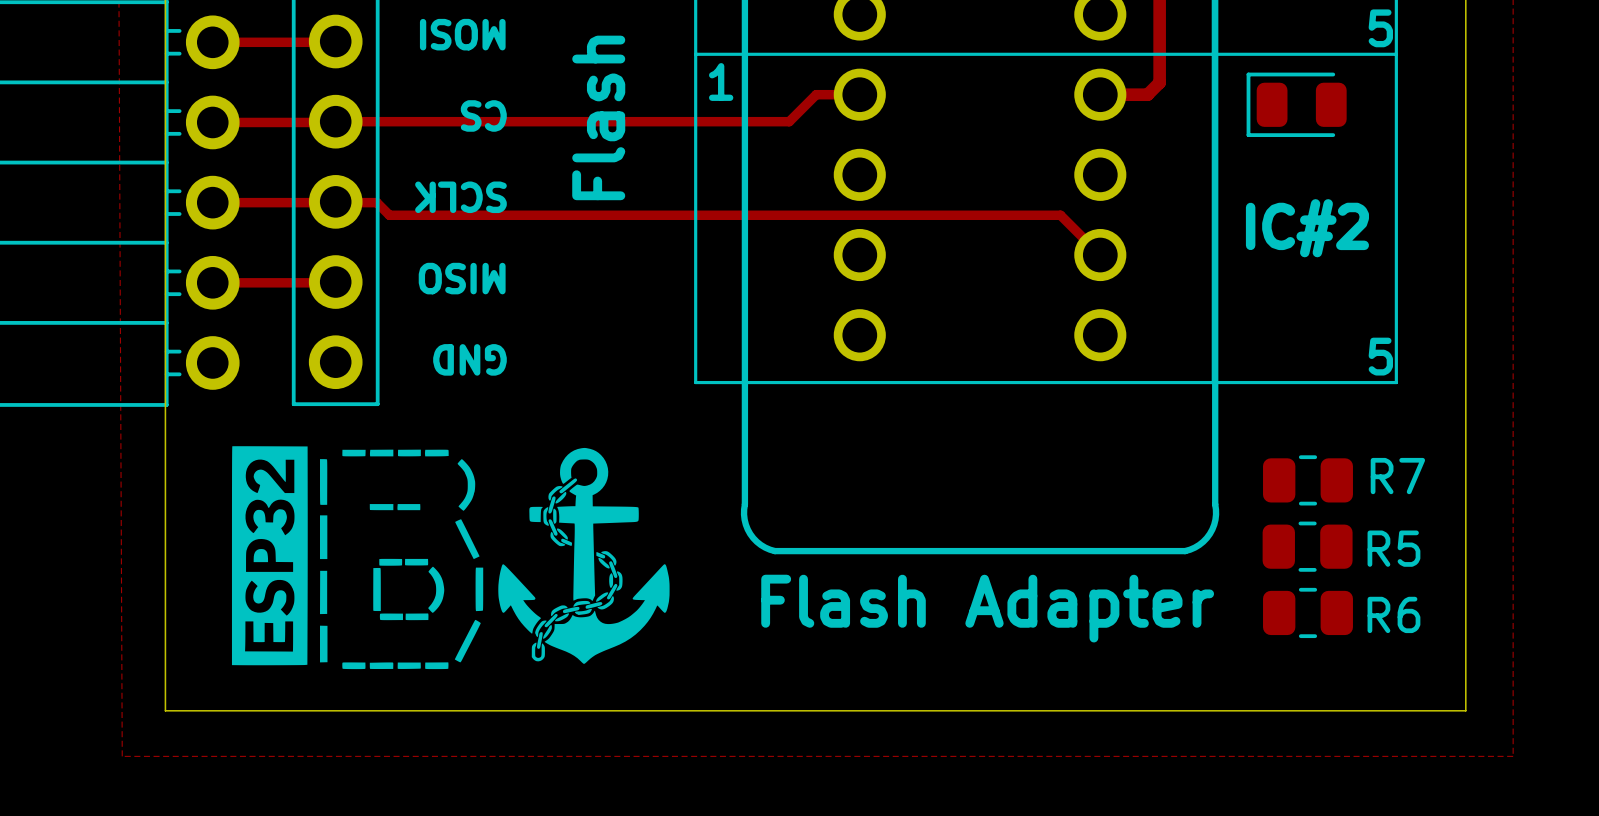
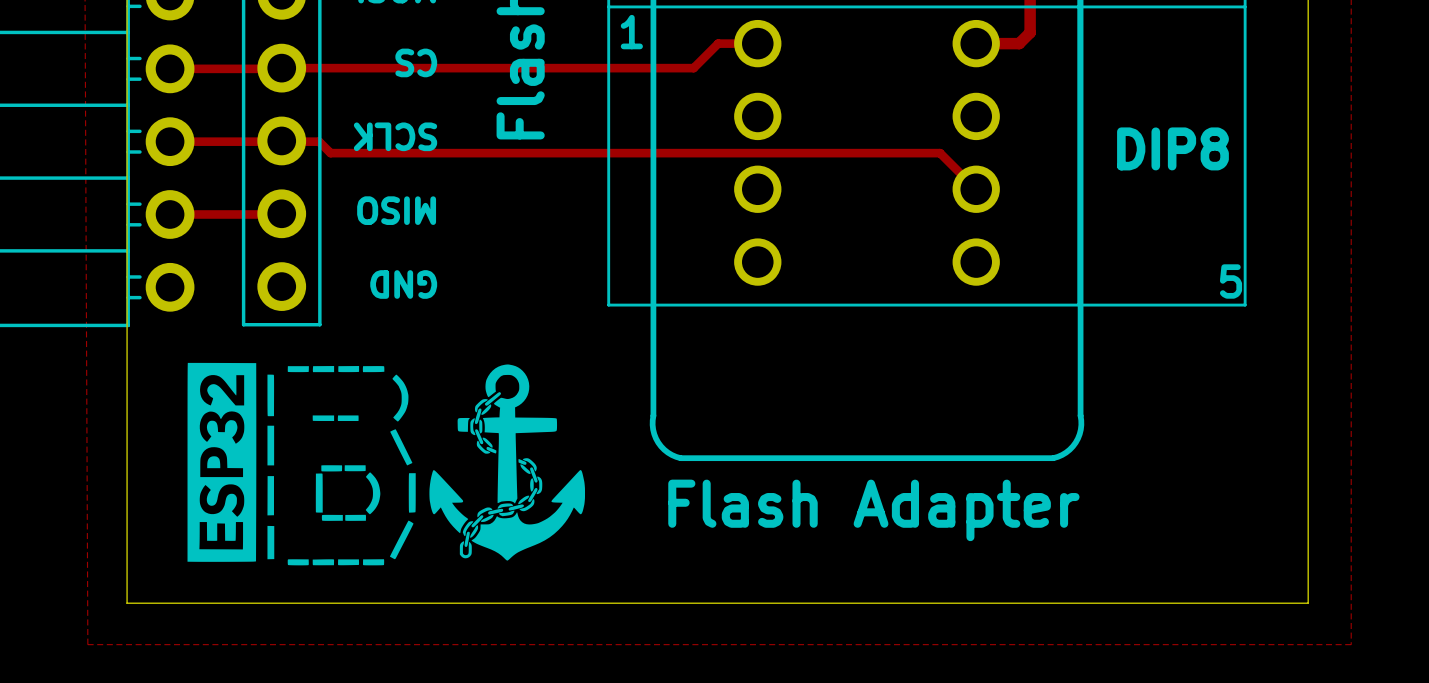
part: (1296, 104) -> none
text: IC#2 (1307, 228) -> DIP8 (1172, 148)
R7: (1307, 480) -> none
R5: (1307, 546) -> none
R6: (1307, 612) -> none

